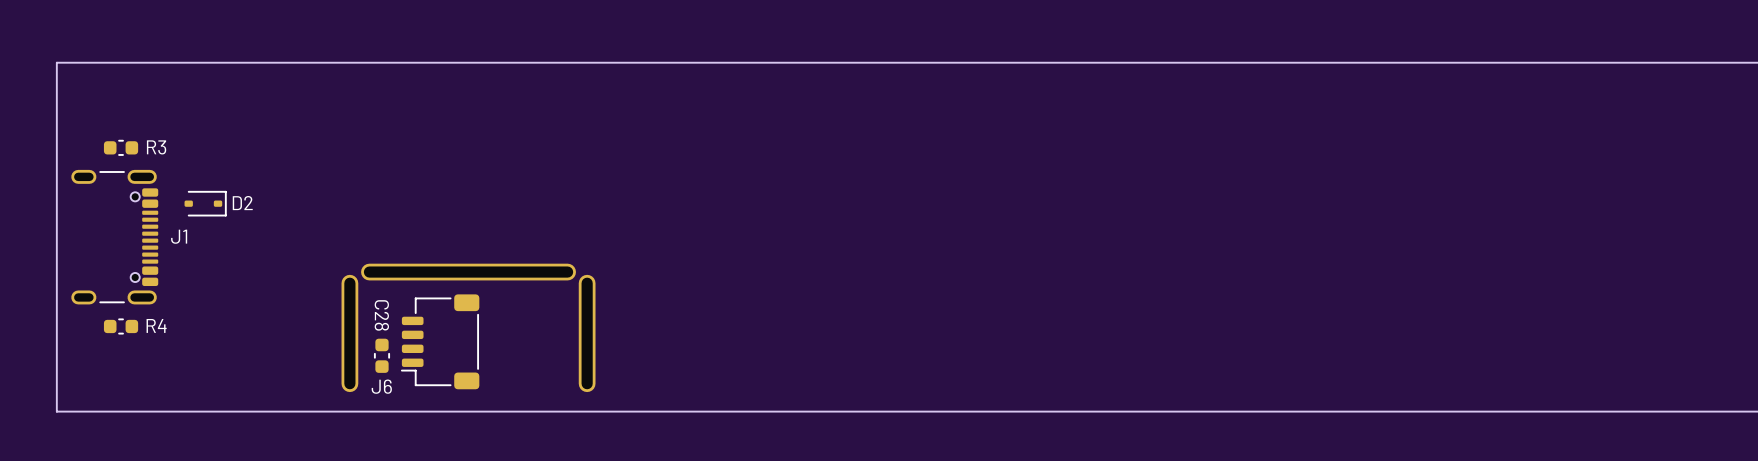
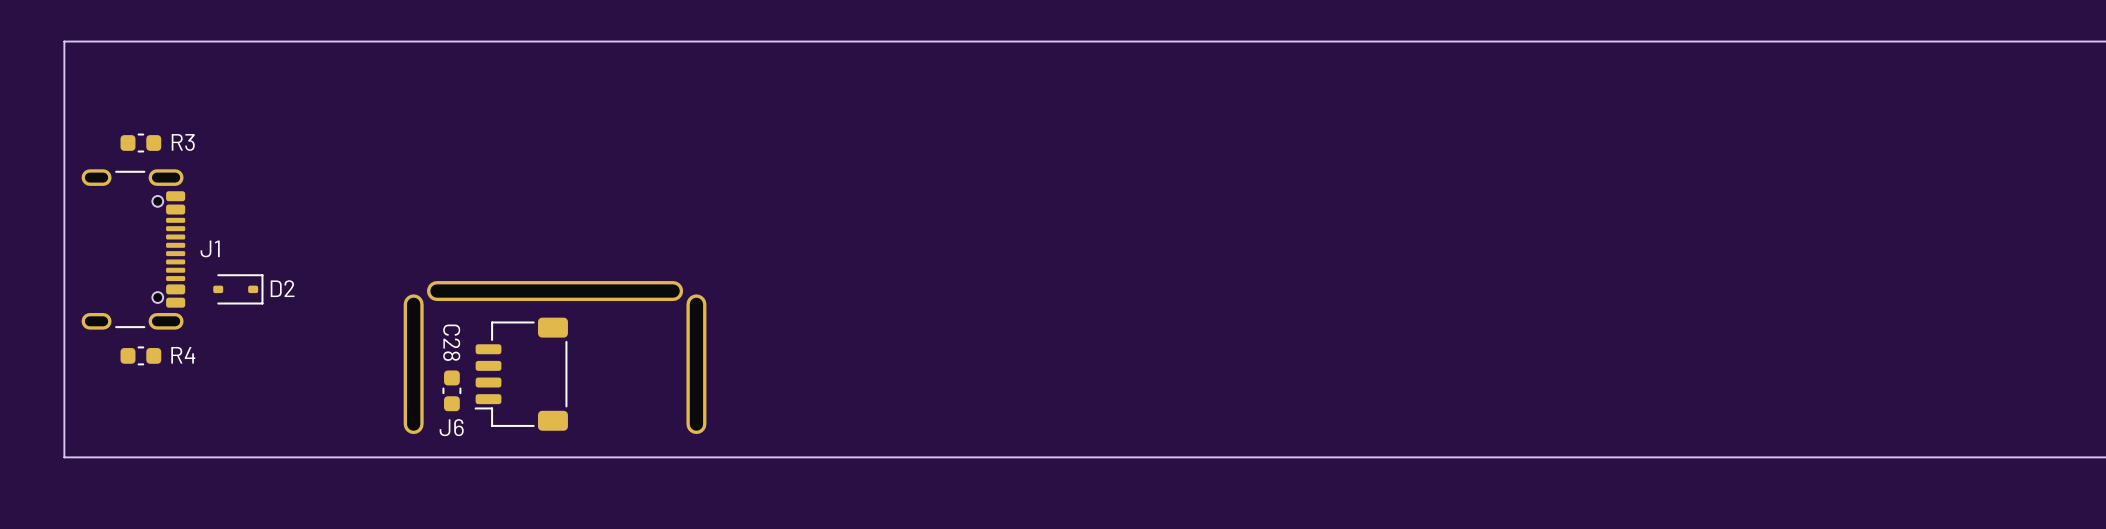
D2 position: (205, 203) -> (238, 289)

